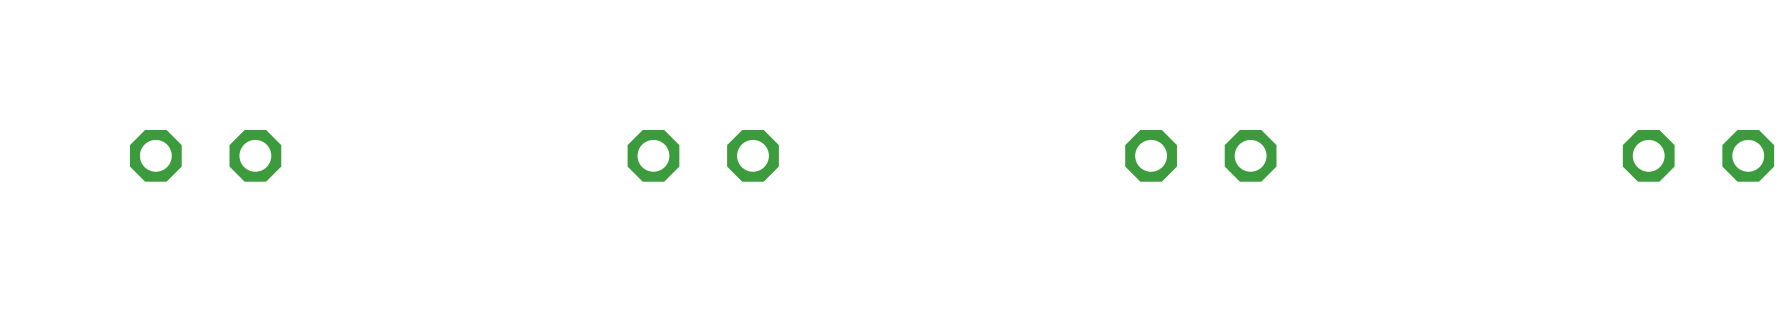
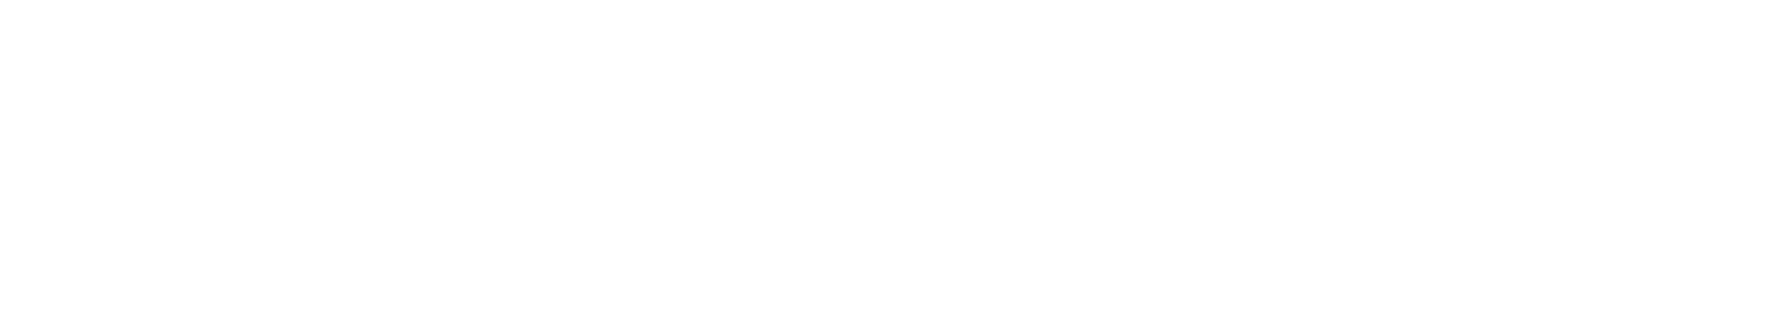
part: (205, 155) -> none
part: (703, 155) -> none
part: (1200, 155) -> none
part: (1698, 155) -> none

